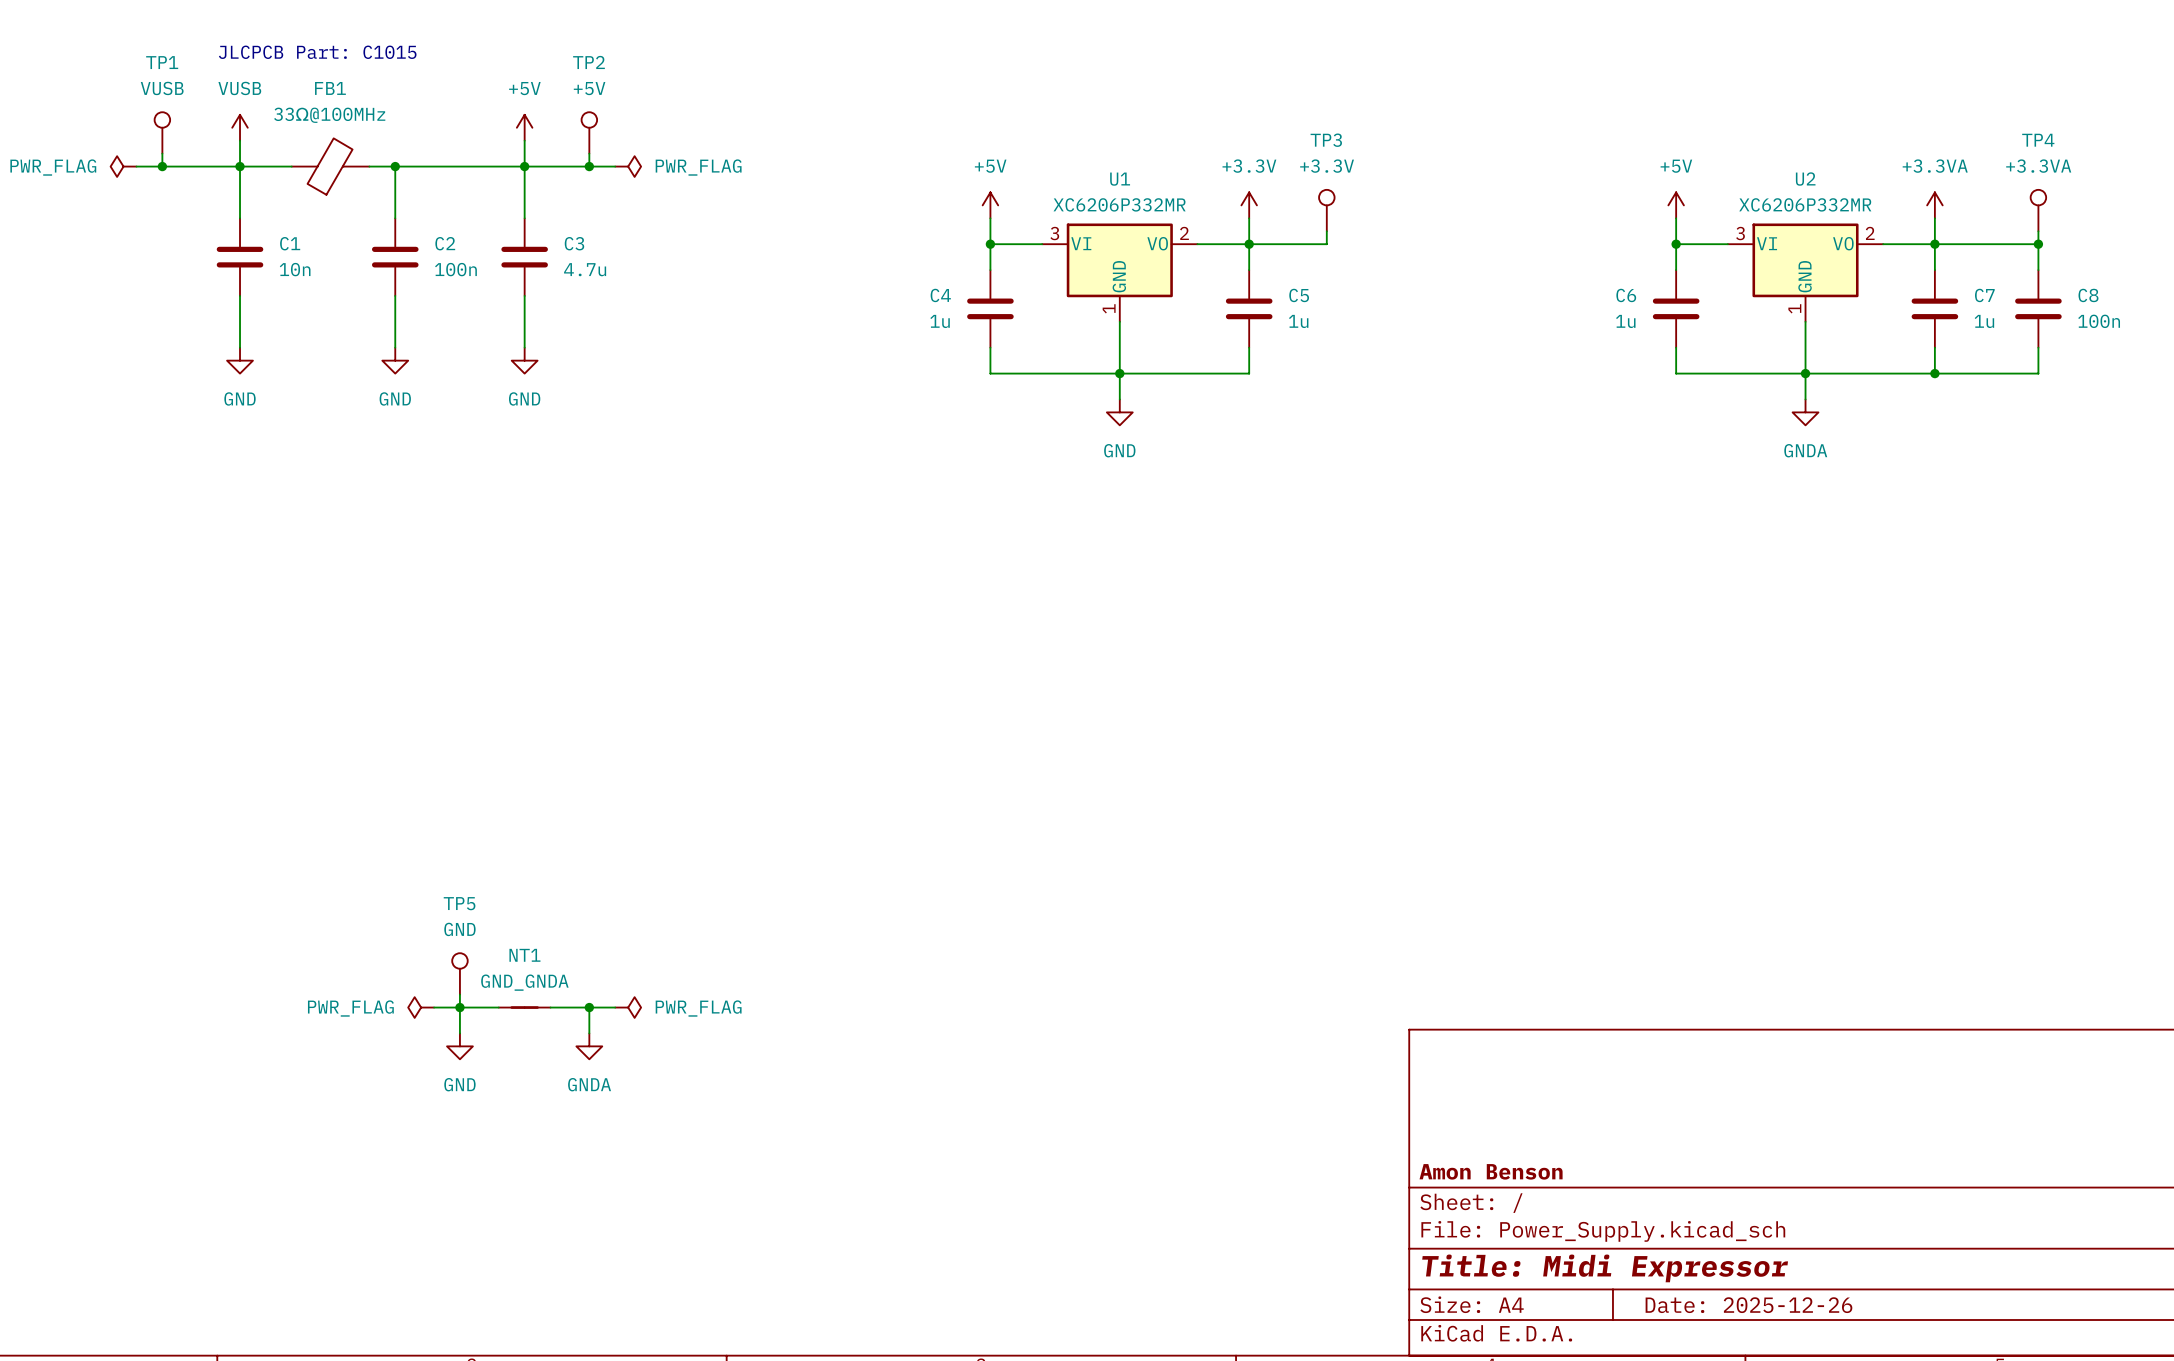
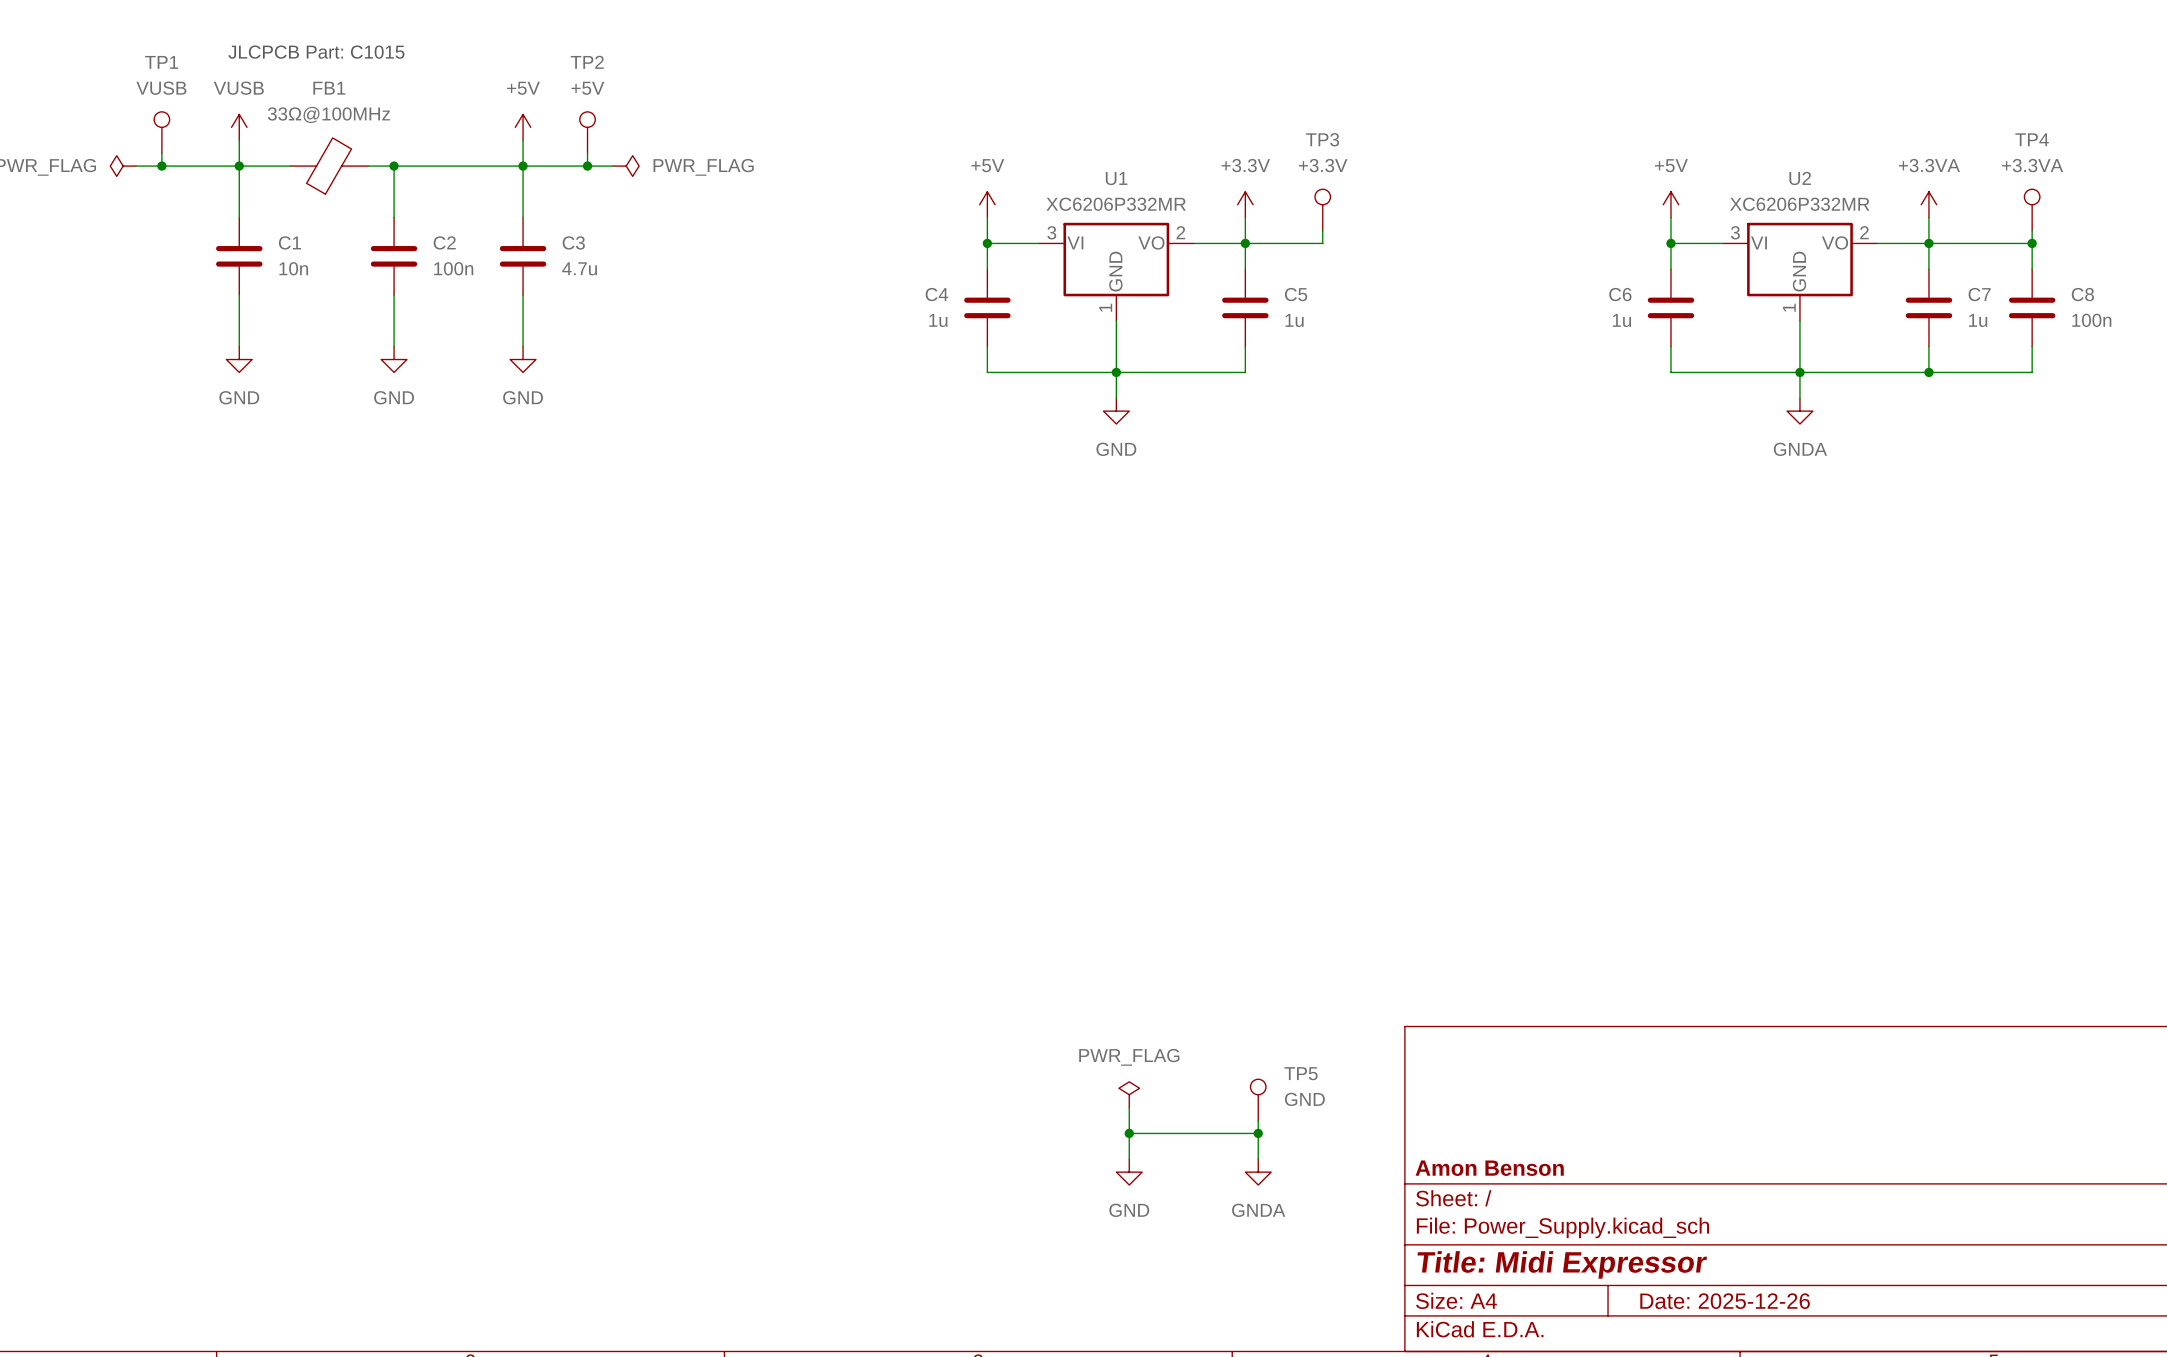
TP5 name position: TP5 (459, 903) -> TP5 (1301, 1073)
TP5 value position: GND (459, 929) -> GND (1304, 1099)
TP5 position: (459, 973) -> (1258, 1099)
wire: (459, 994) (459, 1033) -> none
power symbol: PWR_FLAG (421, 1007) -> none
wire: (434, 1007) (498, 1007) -> none
junction: (459, 1007) -> none
NT1: GND_GNDA (524, 1007) -> none
wire: (550, 1007) (615, 1007) -> none
wire: (589, 1007) (589, 1033) -> none
junction: (589, 1007) -> none
power symbol: PWR_FLAG (628, 1007) -> none
power symbol: GND (459, 1046) -> none
power symbol: GNDA (589, 1046) -> none
power symbol: none -> PWR_FLAG (1129, 1094)
wire: none -> (1129, 1107) (1129, 1159)
wire: none -> (1258, 1120) (1258, 1159)
wire: none -> (1129, 1133) (1258, 1133)
junction: none -> (1129, 1133)
junction: none -> (1258, 1133)
power symbol: none -> GND (1129, 1172)
power symbol: none -> GNDA (1258, 1172)

